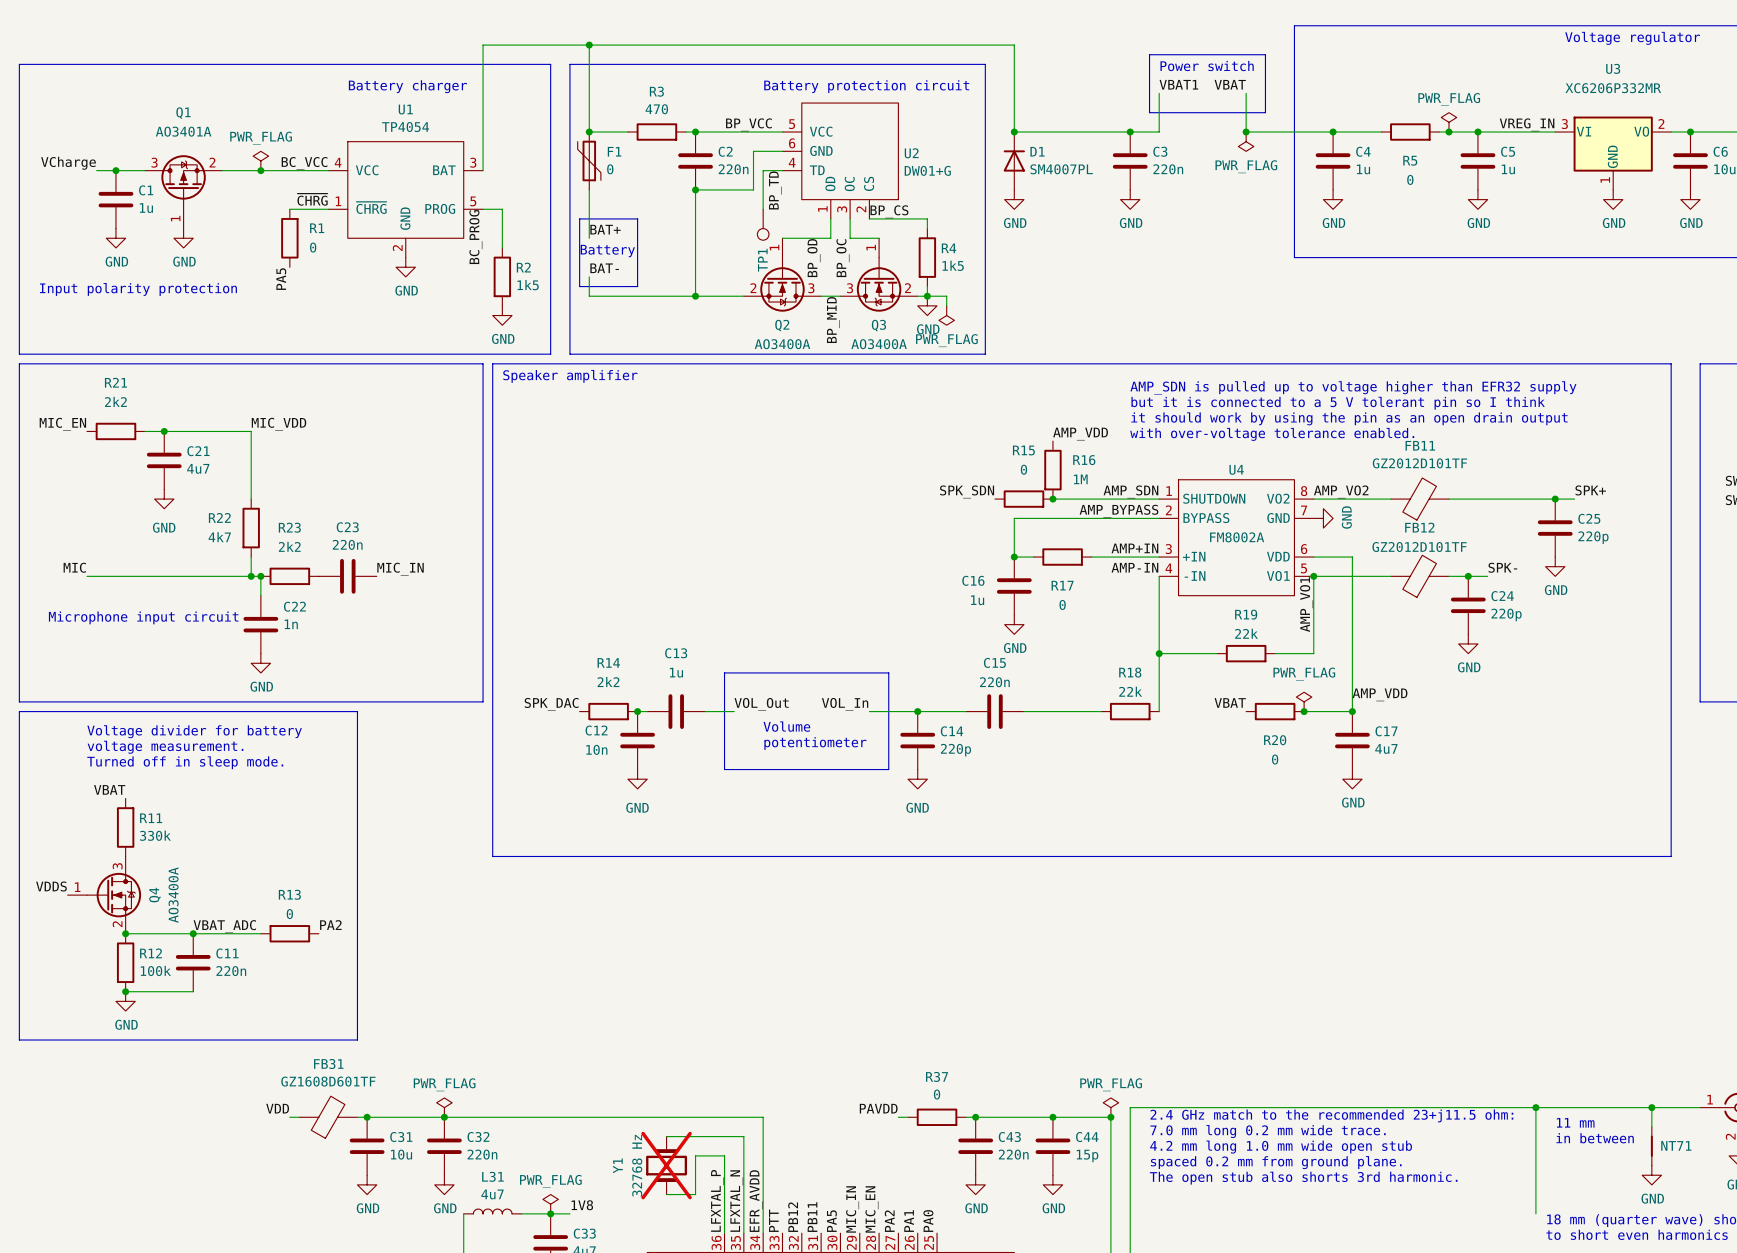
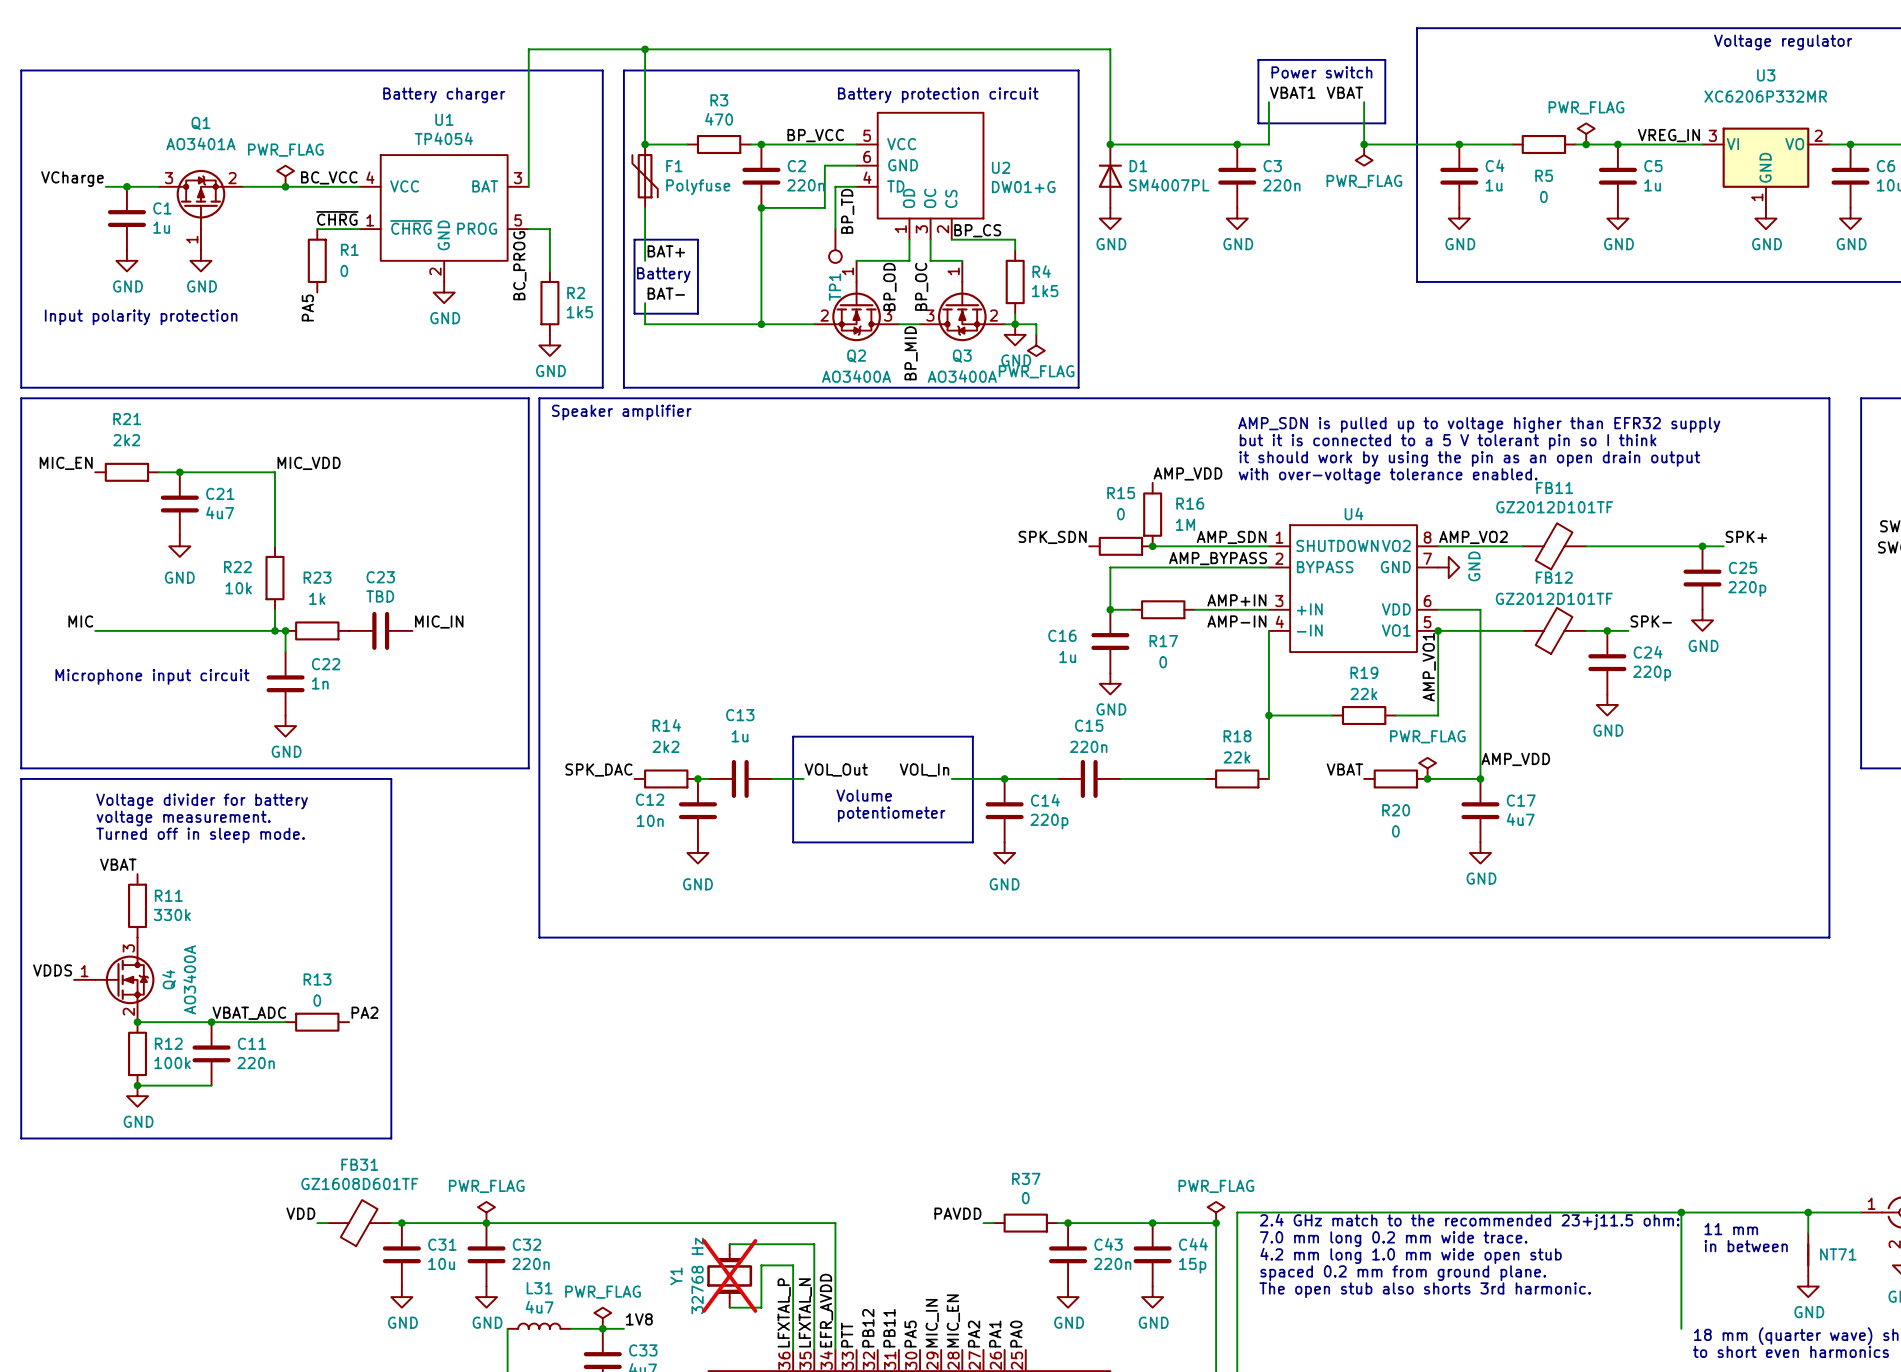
F1 value: 0 (610, 169) -> Polyfuse (698, 187)
R22 value: 4k7 (219, 537) -> 10k (238, 588)
U4 value: FM8002A (1237, 537) -> none
C23 value: 220n (347, 544) -> TBD (380, 596)
R23 value: 2k2 (289, 546) -> 1k (317, 598)

